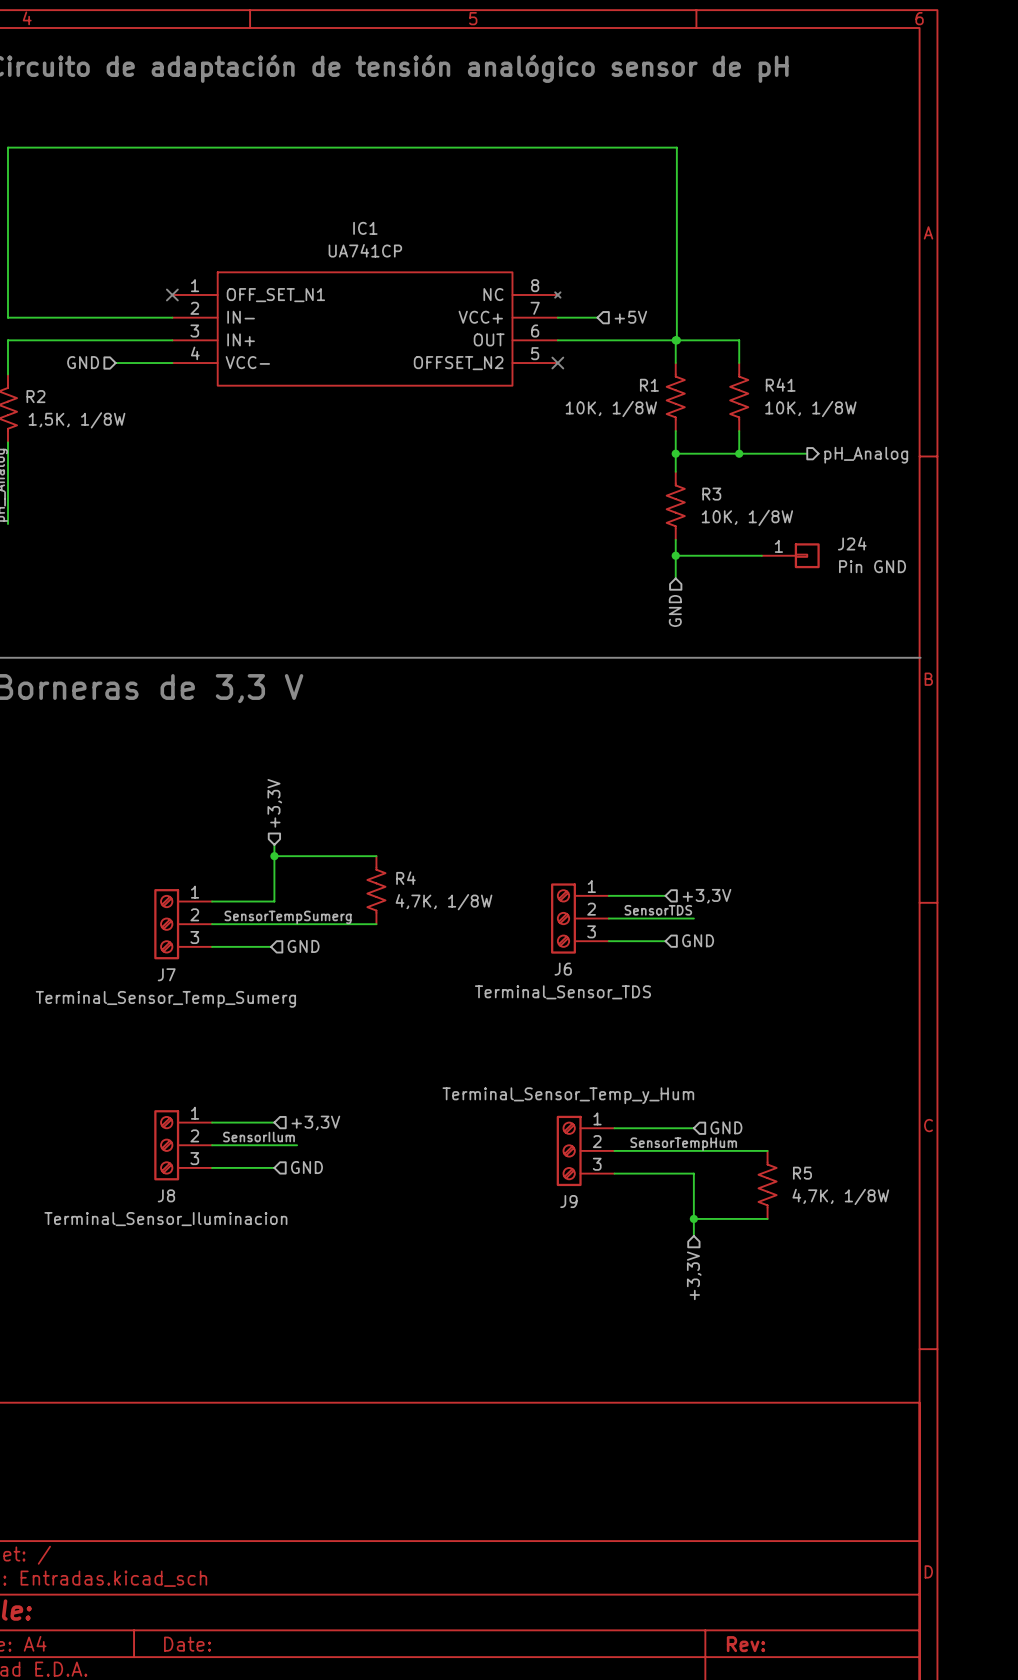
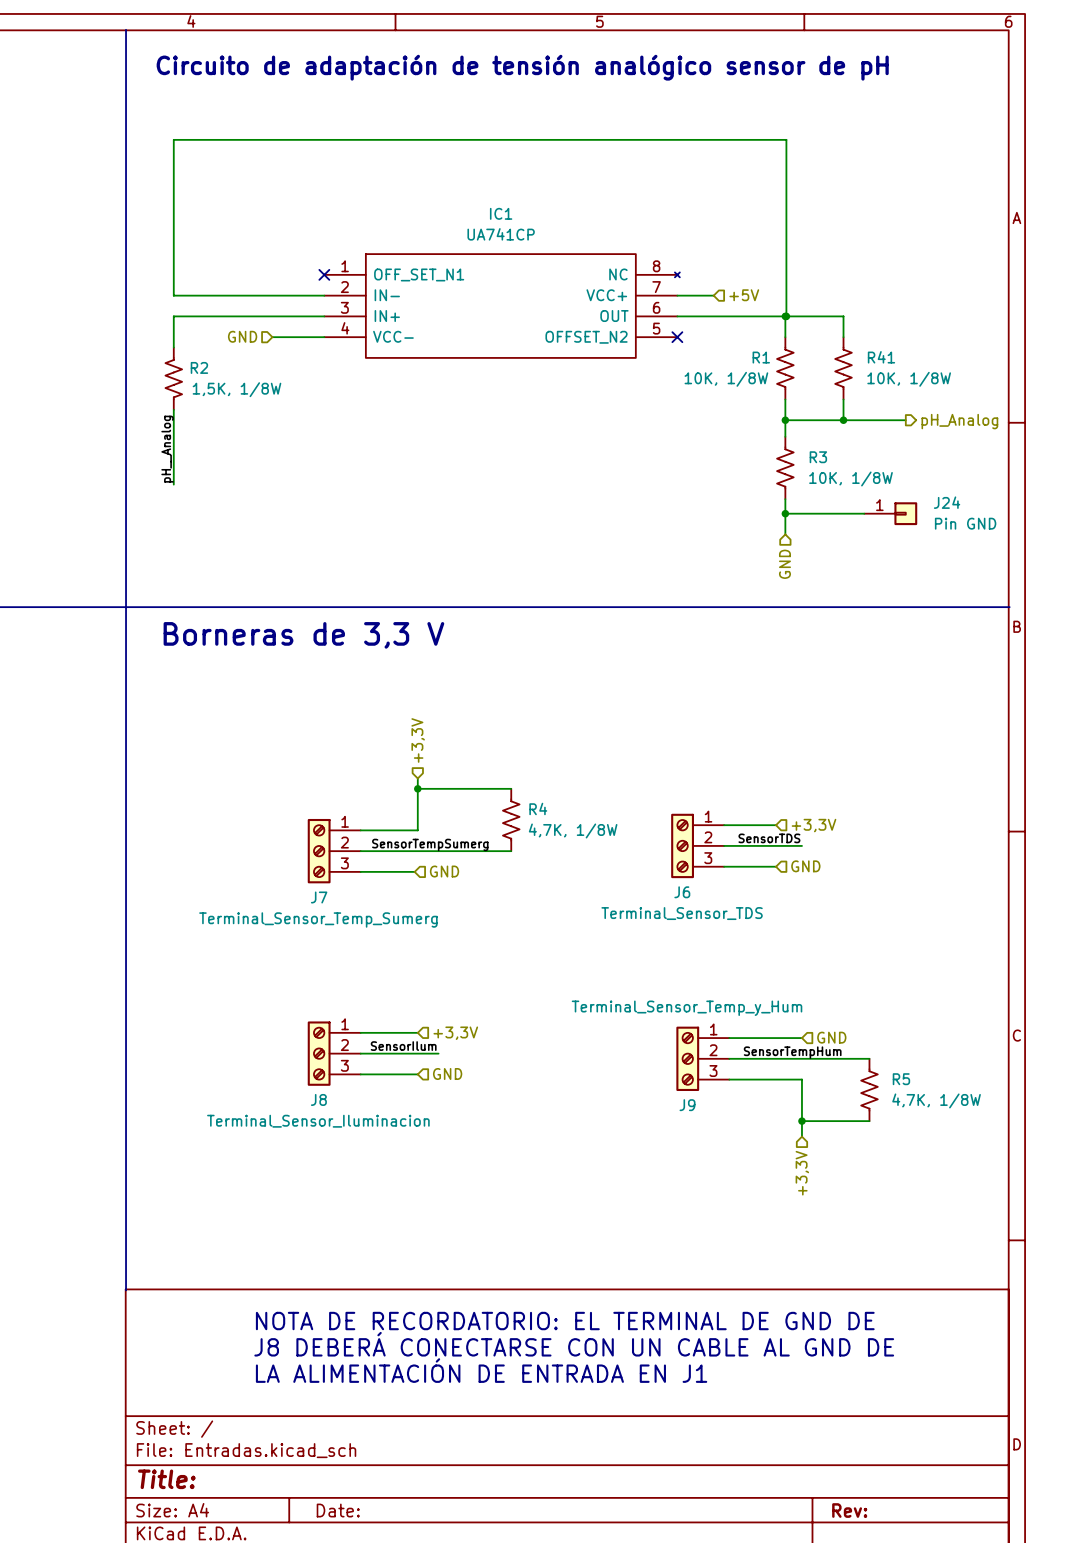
text: none -> NOTA DE RECORDATORIO: EL TERMINAL DE GND DE (565, 1321)
text: none -> J8 DEBERÁ CONECTARSE CON UN CABLE AL GND DE (574, 1344)
text: none -> LA ALIMENTACIÓN DE ENTRADA EN J1 (481, 1370)

